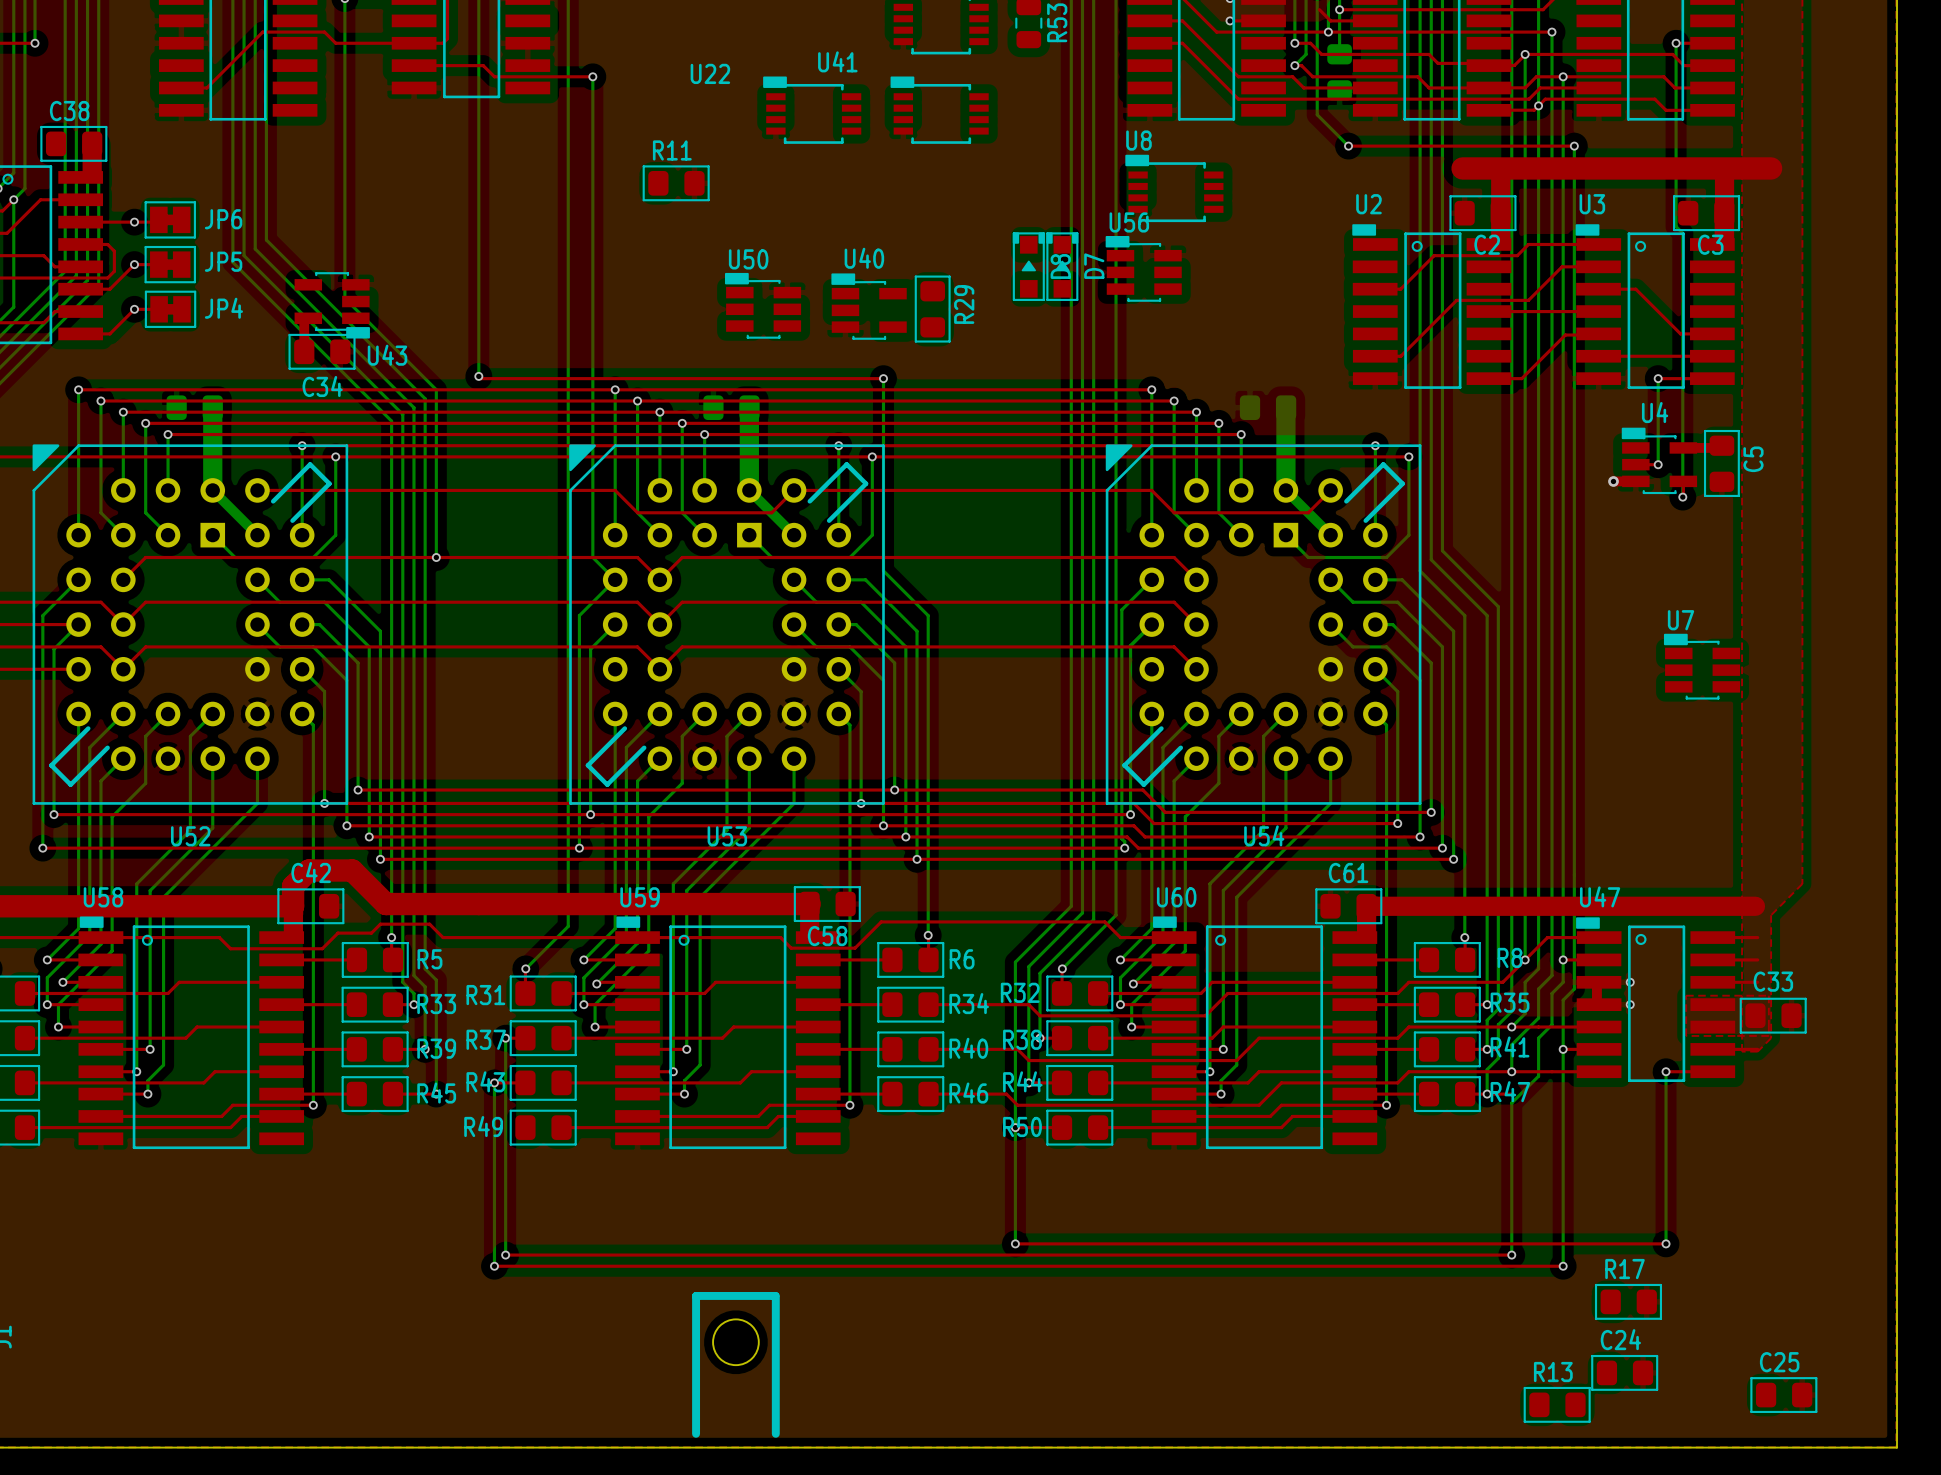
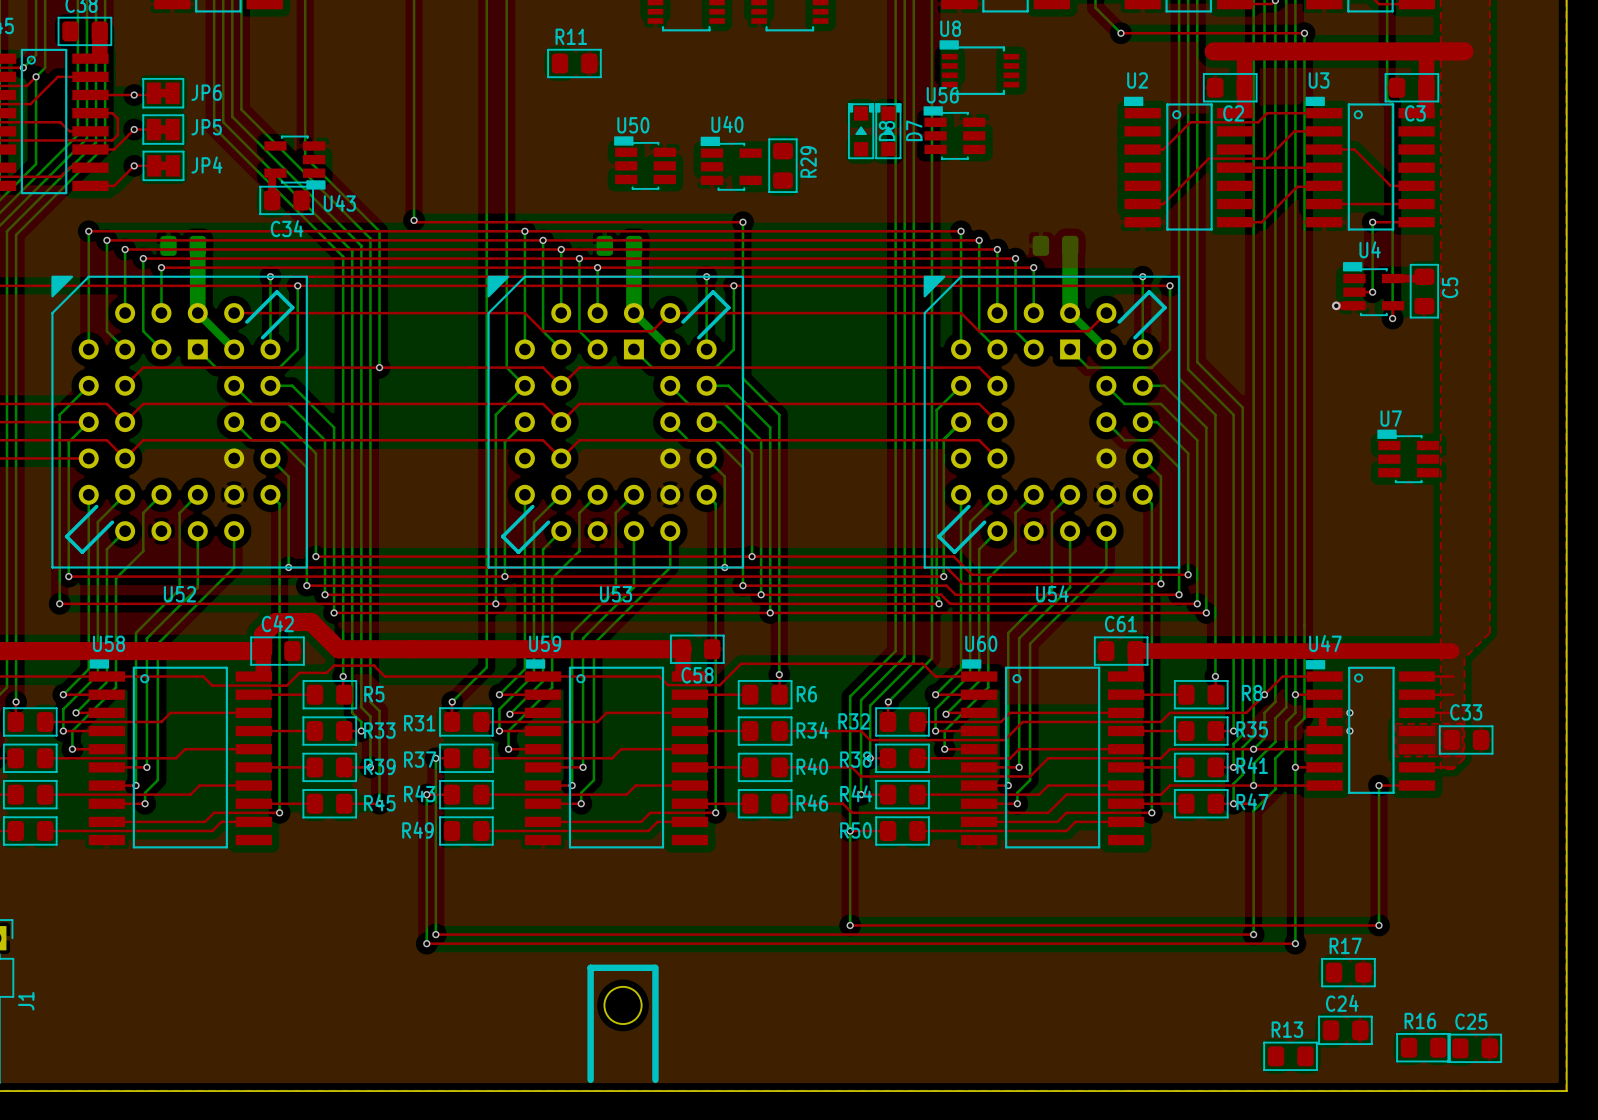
R16: none -> (1423, 1047)

